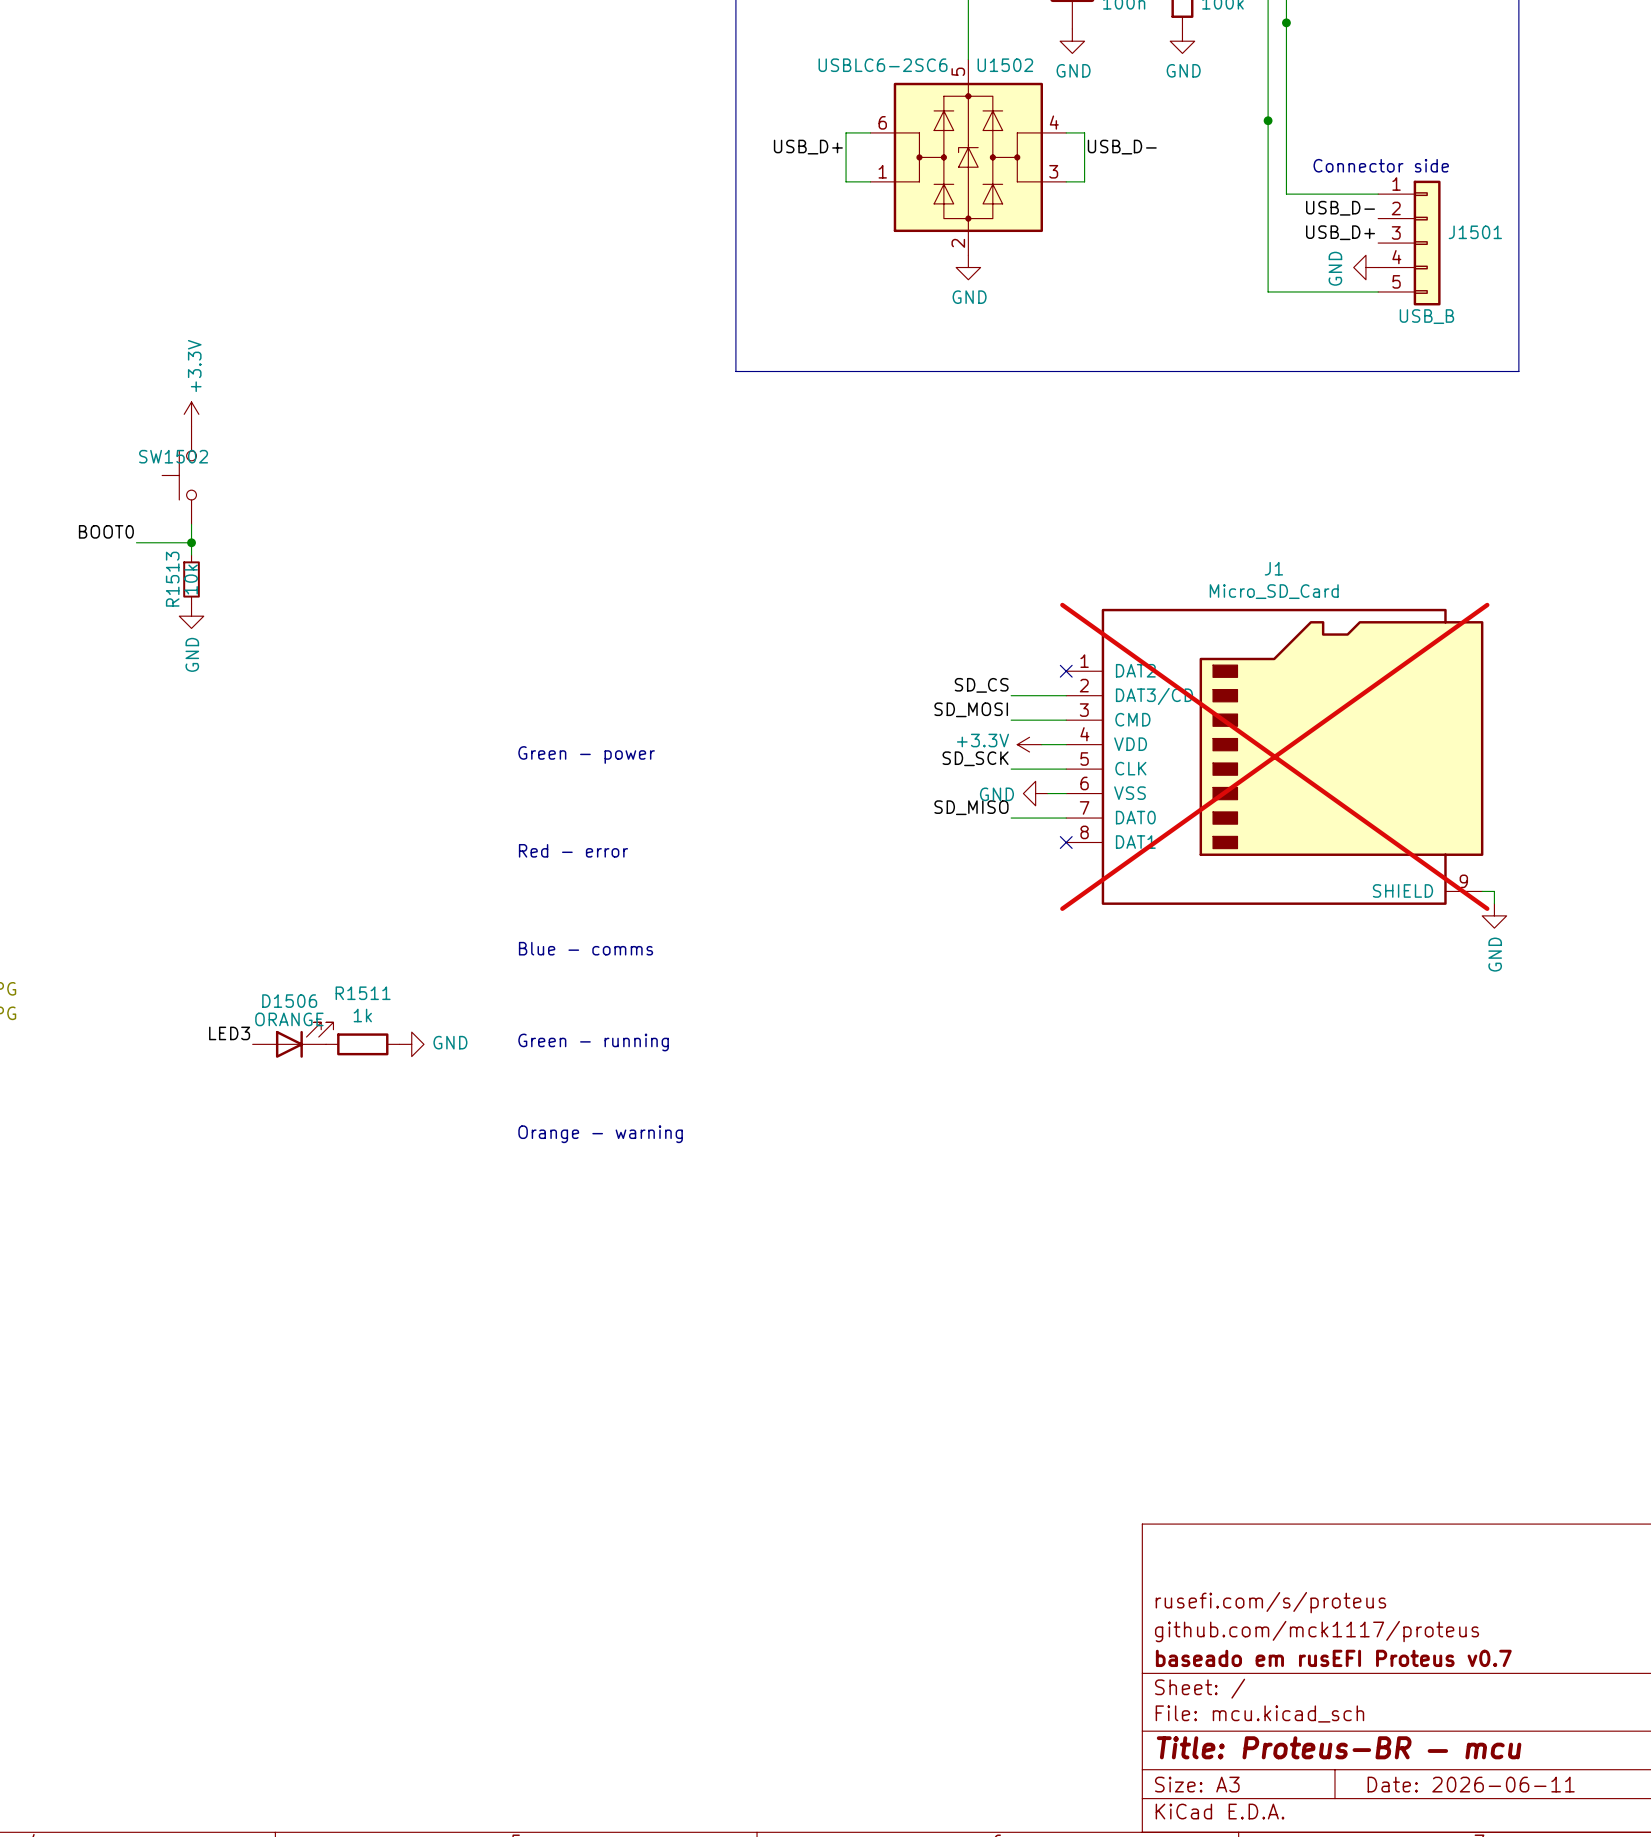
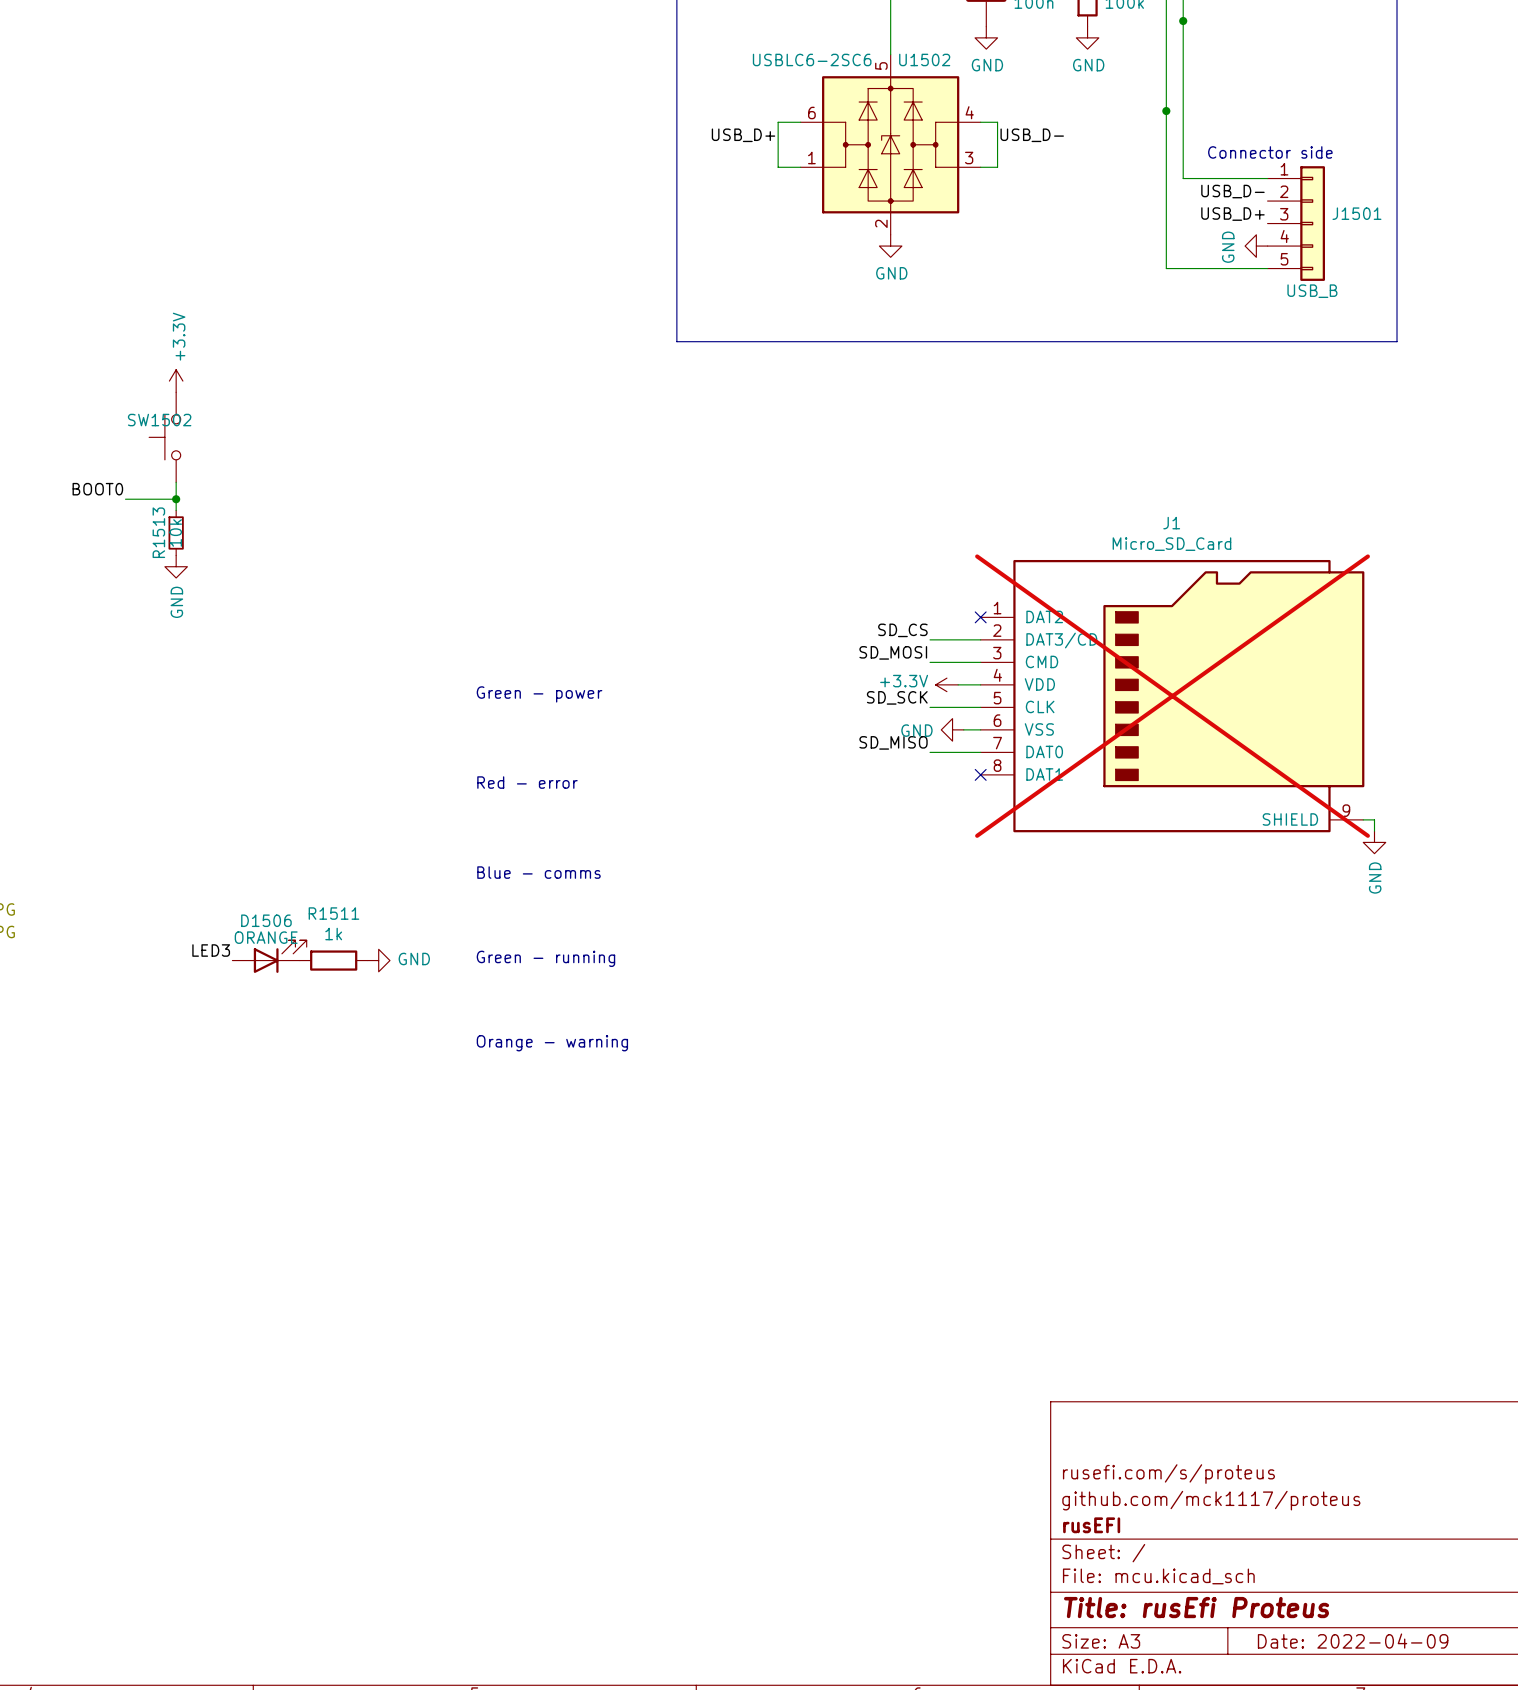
title block: baseado em rusEFI Proteus v0.7 (1333, 1658) -> rusEFI (1091, 1525)
title block: Title: Proteus-BR — mcu (1339, 1747) -> Title: rusEfi Proteus (1196, 1607)
title block: Date: 2026-06-11 (1471, 1784) -> Date: 2022-04-09 (1353, 1641)

